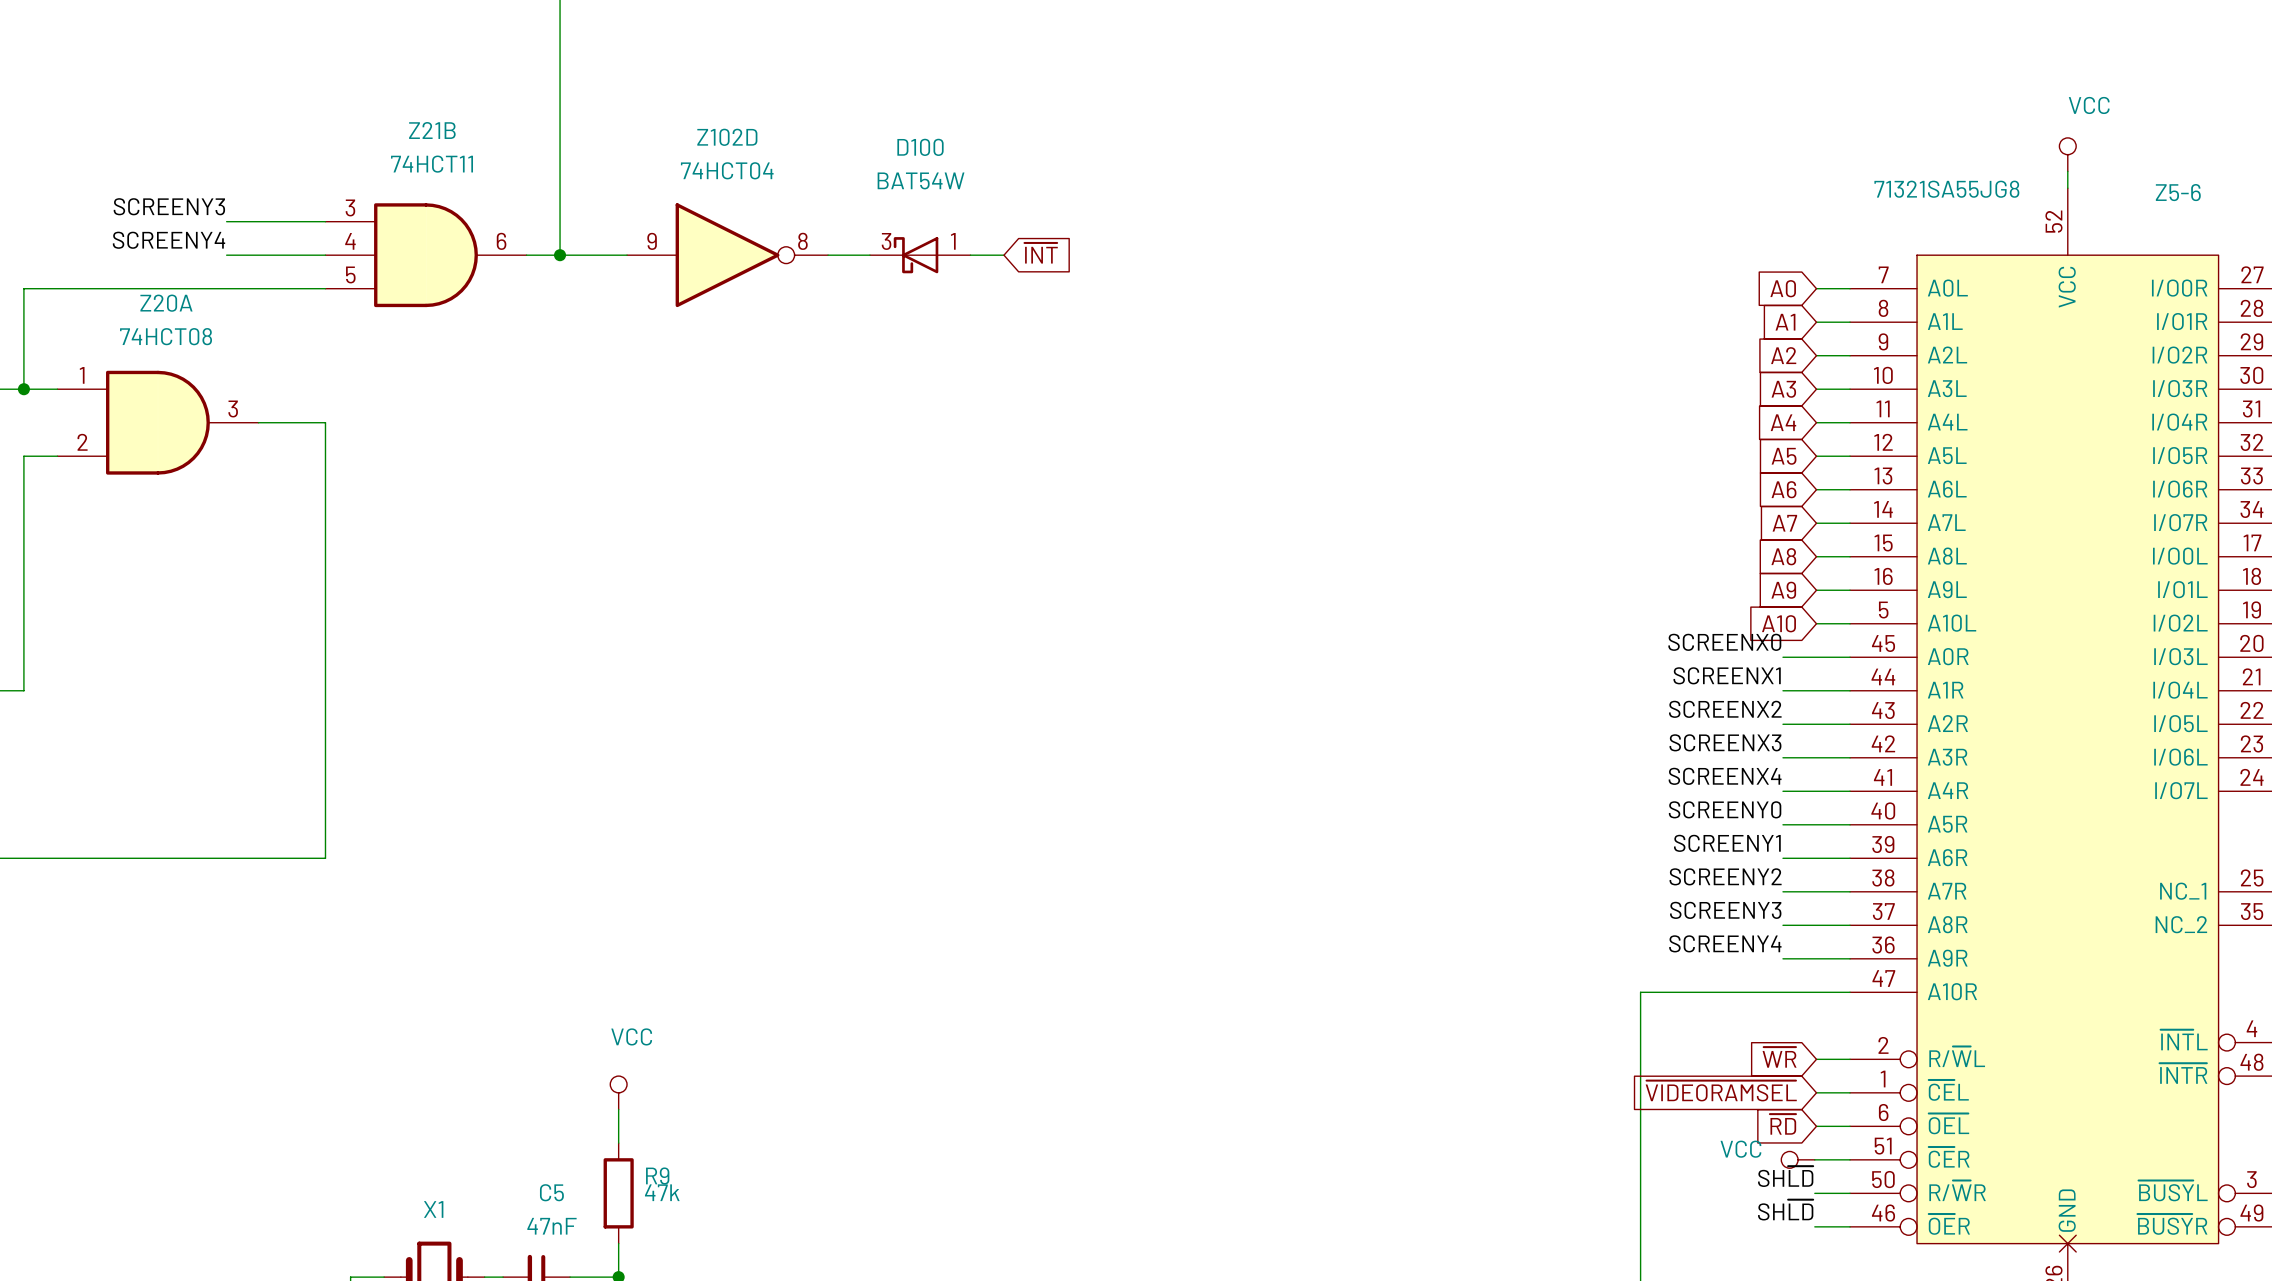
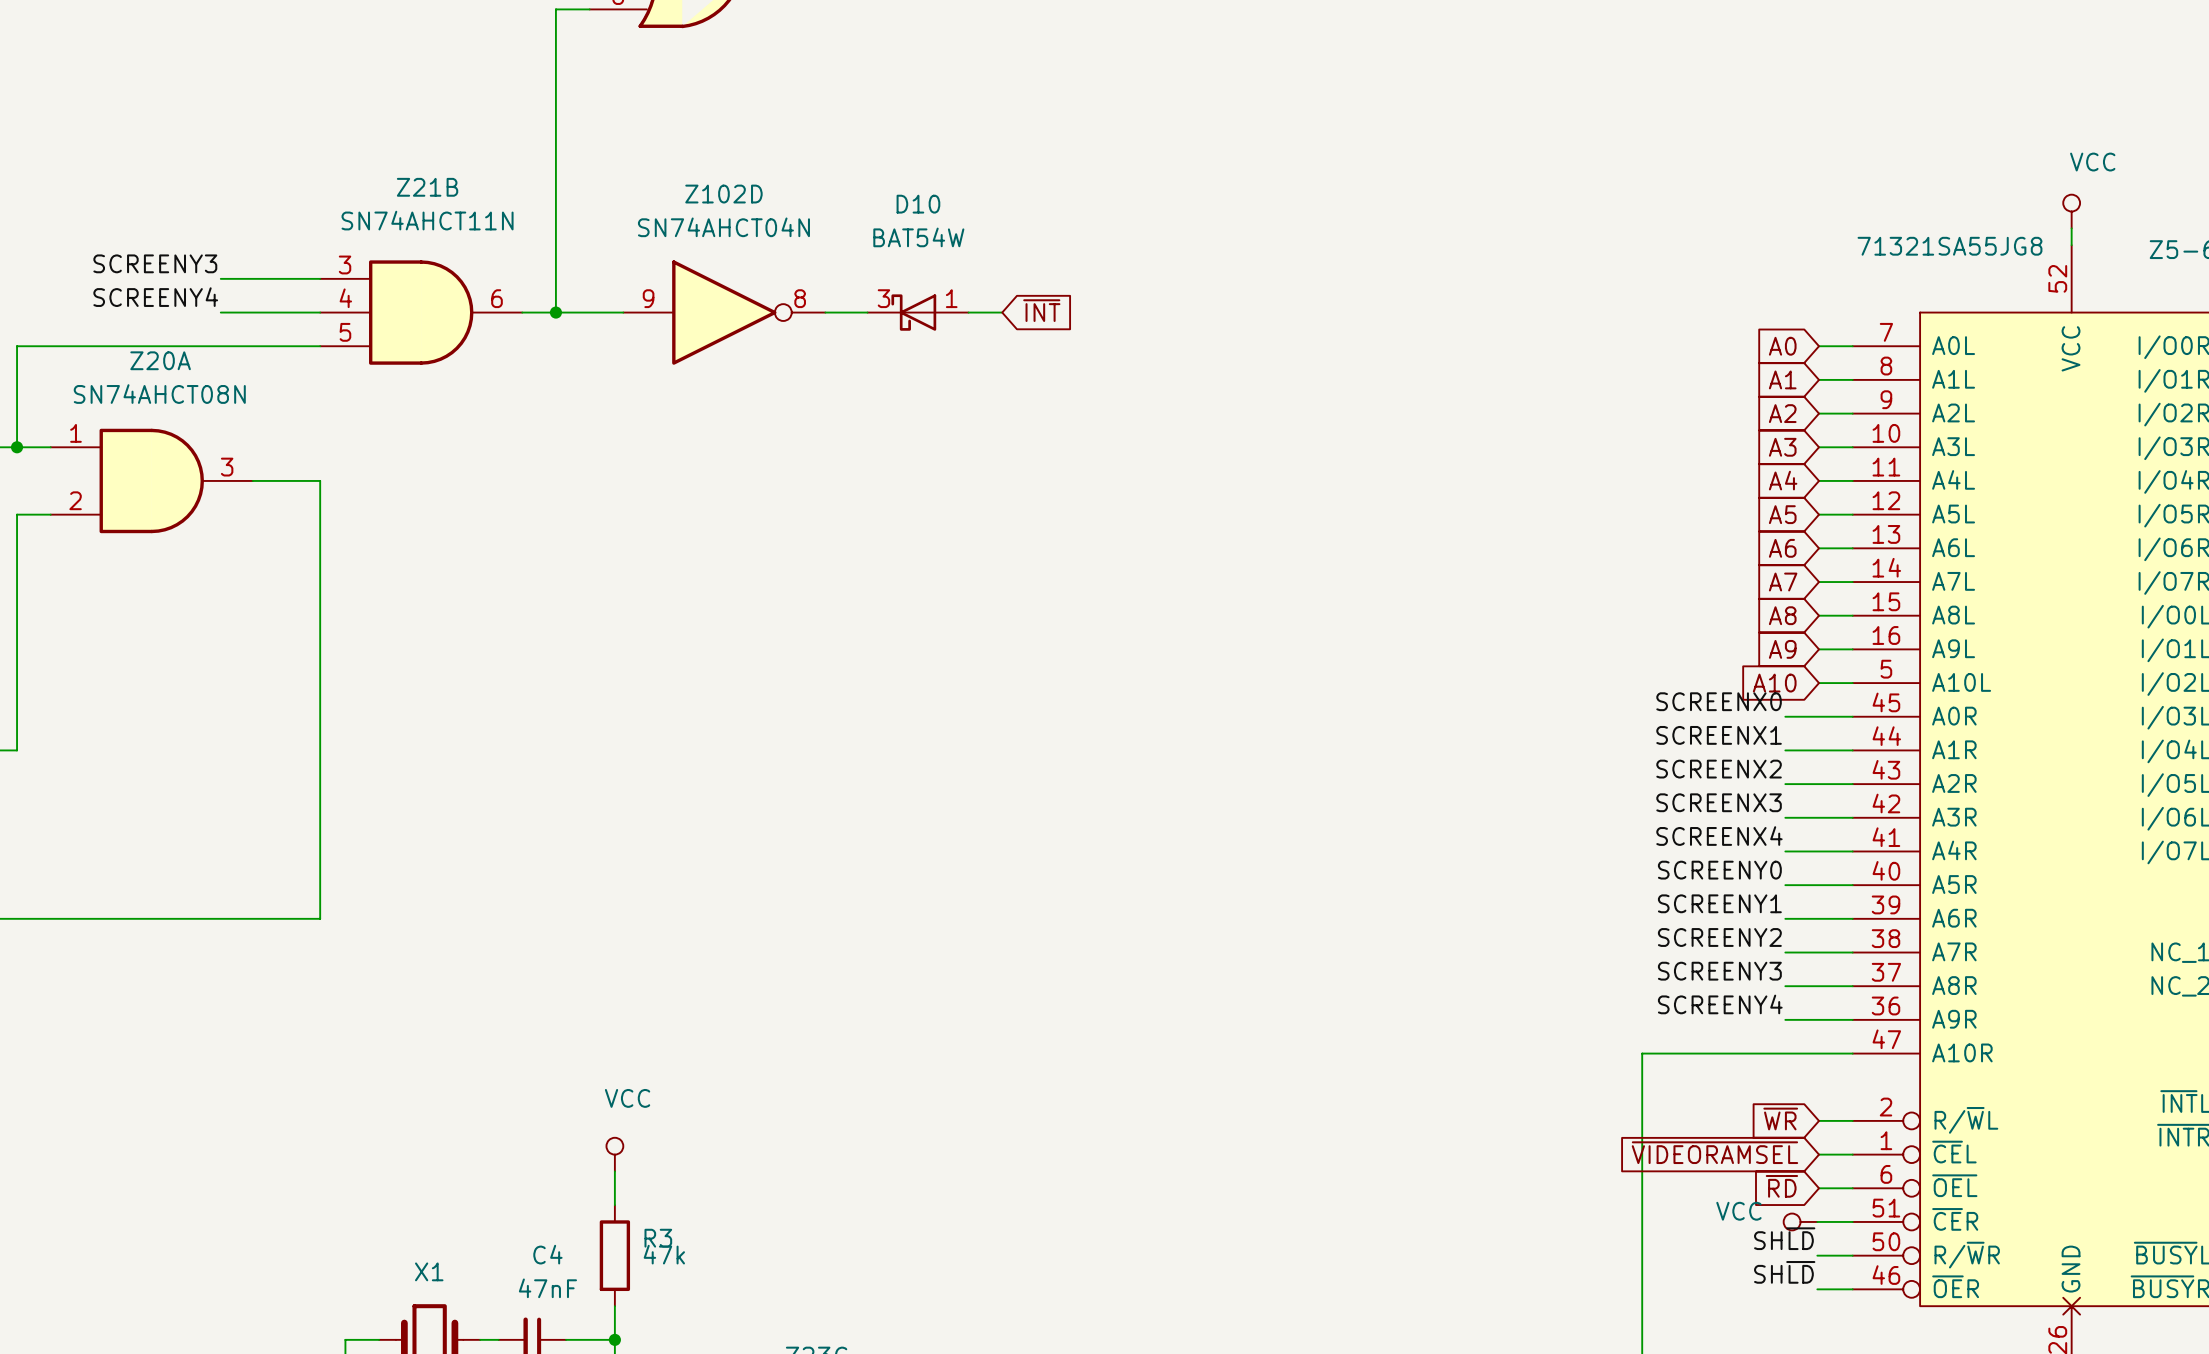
D100 name: D100 (920, 147) -> D10 (918, 204)
Z21B value: 74HCT11 (432, 164) -> SN74AHCT11N (427, 220)
Z102D value: 74HCT04 (727, 170) -> SN74AHCT04N (723, 227)
Z20A value: 74HCT08 (166, 336) -> SN74AHCT08N (159, 394)
R9 name: R9 (657, 1175) -> R3 (658, 1238)
C5 name: C5 (551, 1192) -> C4 (547, 1254)

